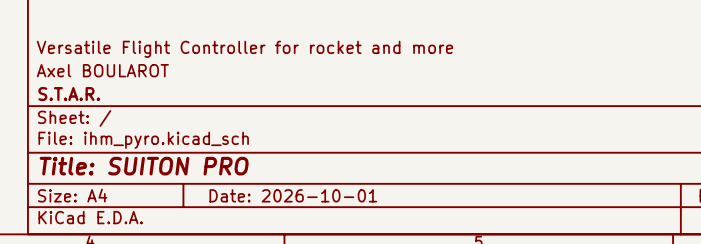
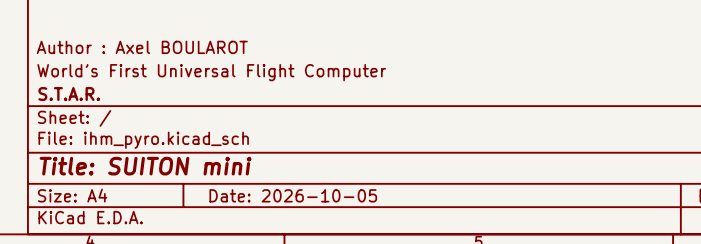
title block: Versatile Flight Controller for rocket and more (244, 49) -> Author : Axel BOULAROT (142, 47)
title block: Axel BOULAROT (102, 70) -> World’s First Universal Flight Computer (211, 72)
title block: Title: SUITON PRO (144, 166) -> Title: SUITON mini (145, 166)
title block: Date: 2026-10-01 (293, 195) -> Date: 2026-10-05 (293, 195)

